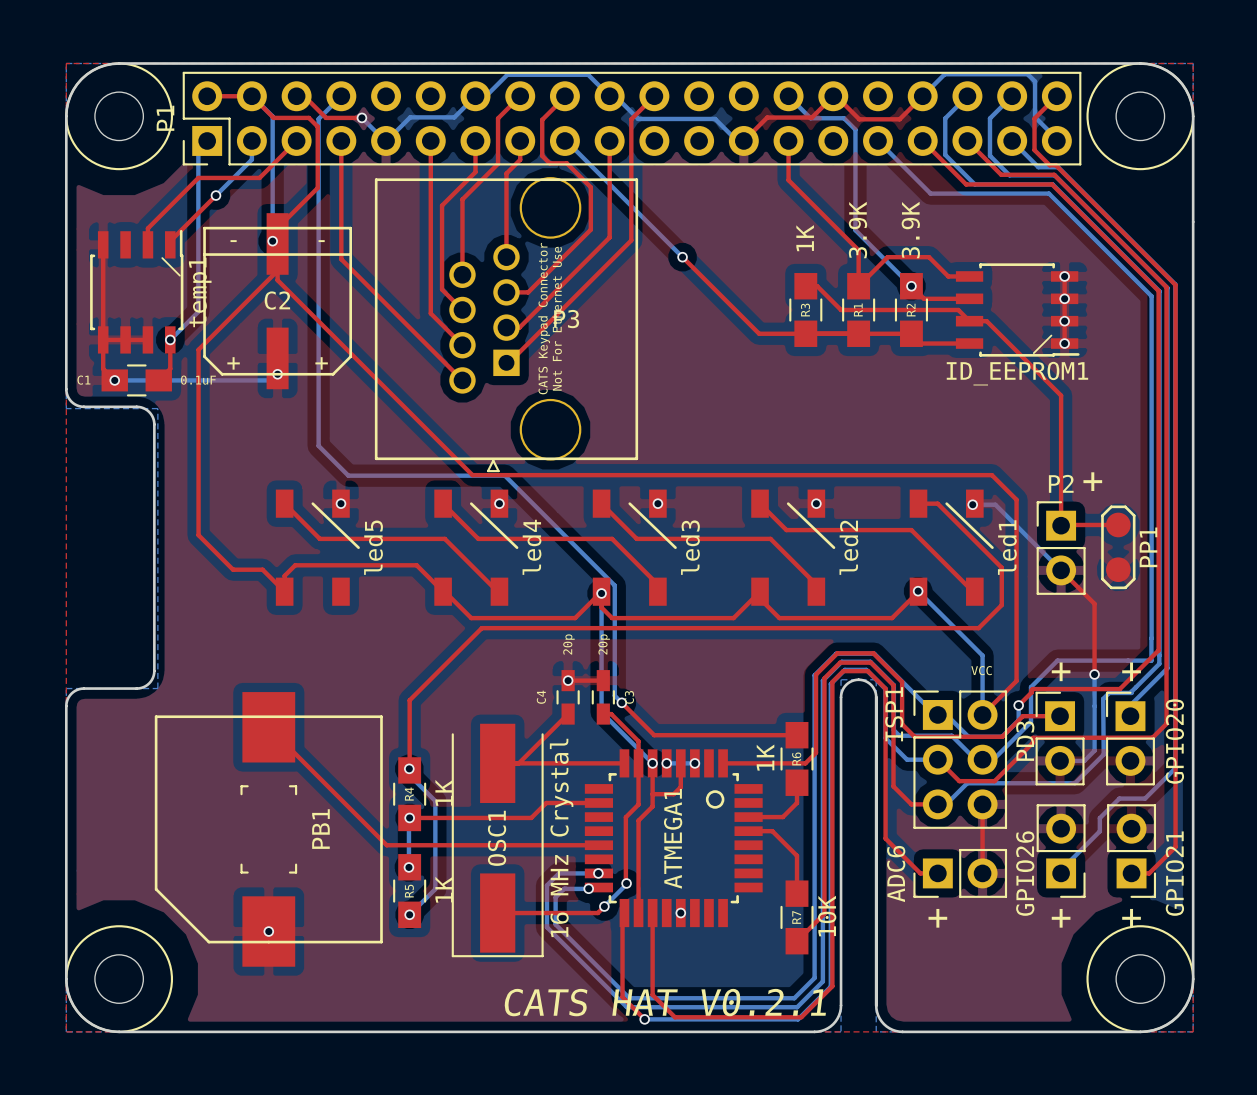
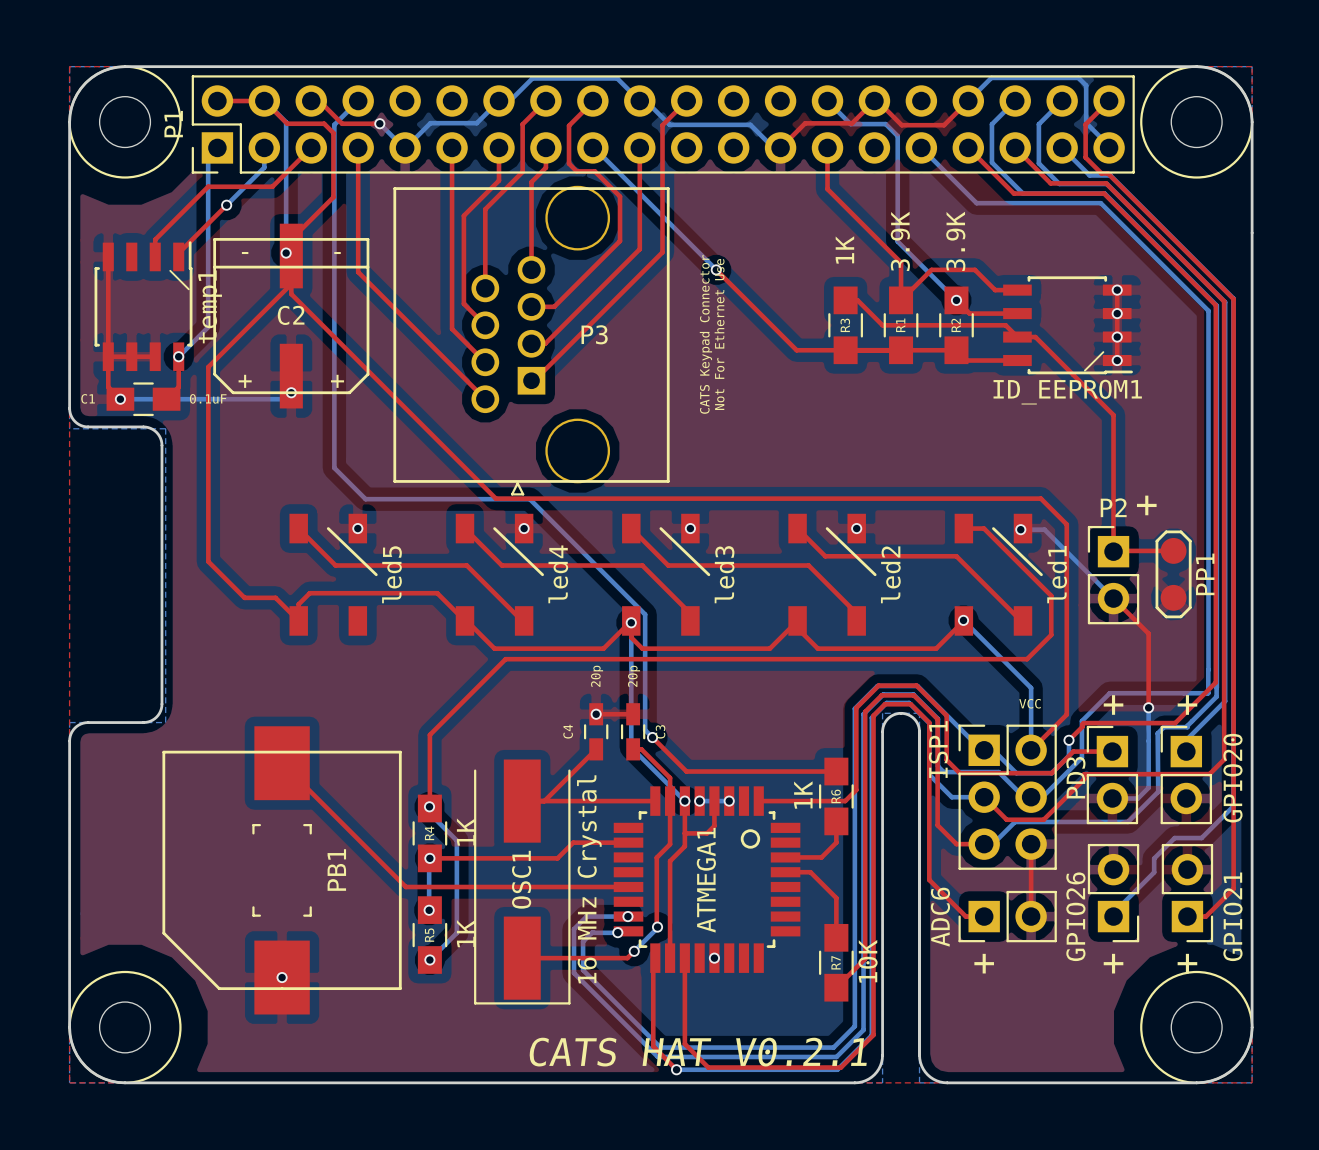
text position: CATS Keypad Connector (544, 318) -> CATS Keypad Connector (705, 334)
text position: Not For Ethernet Use (557, 318) -> Not For Ethernet Use (719, 334)

